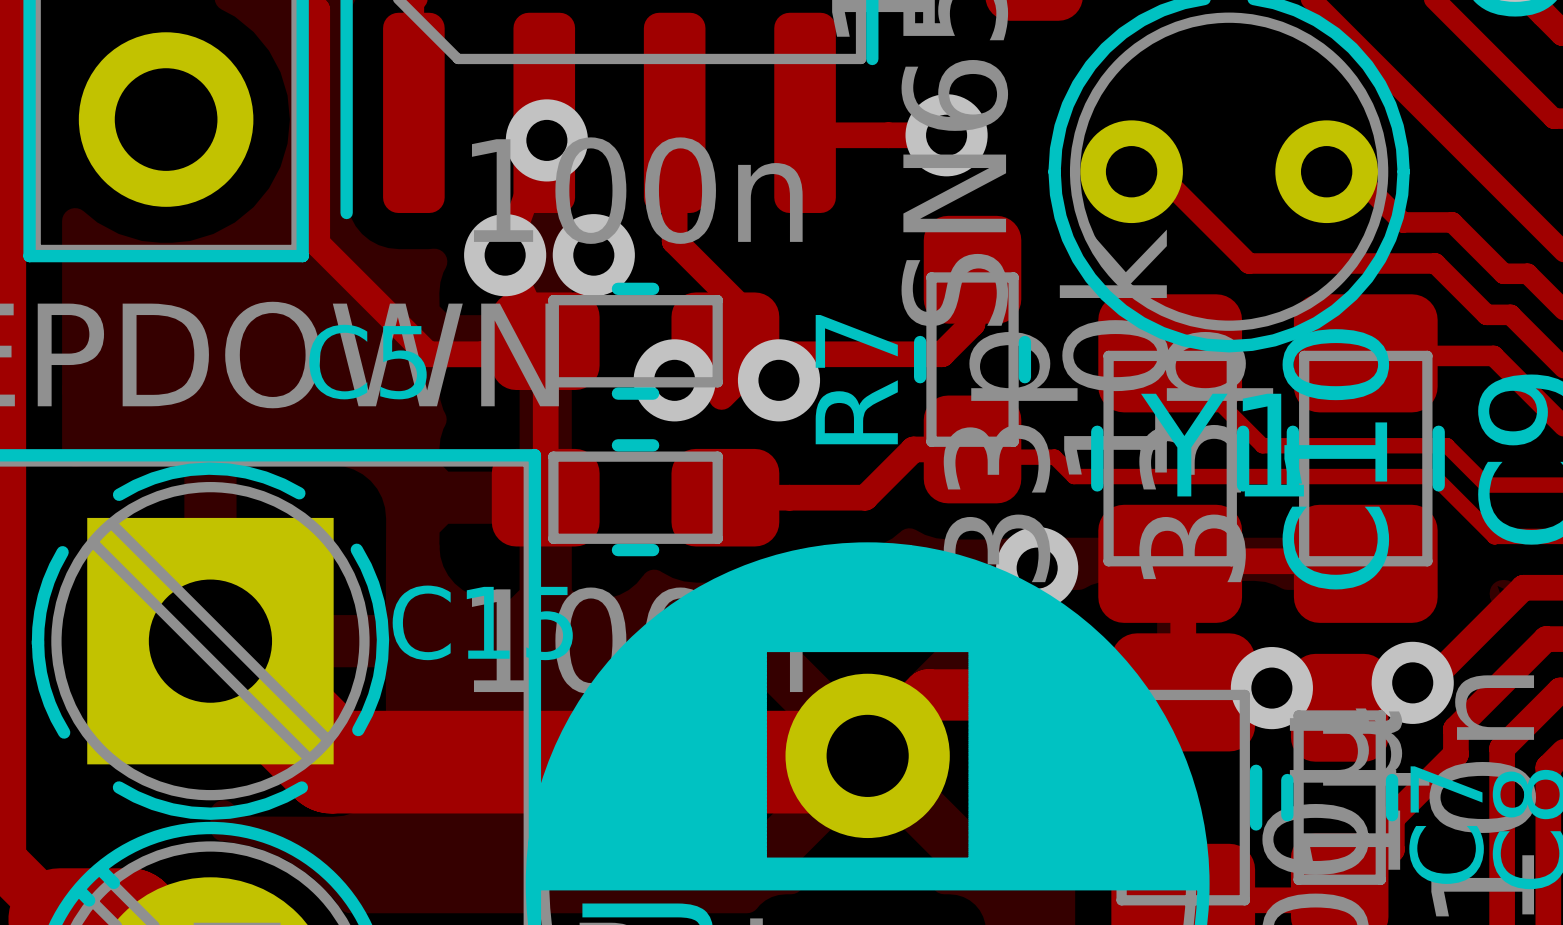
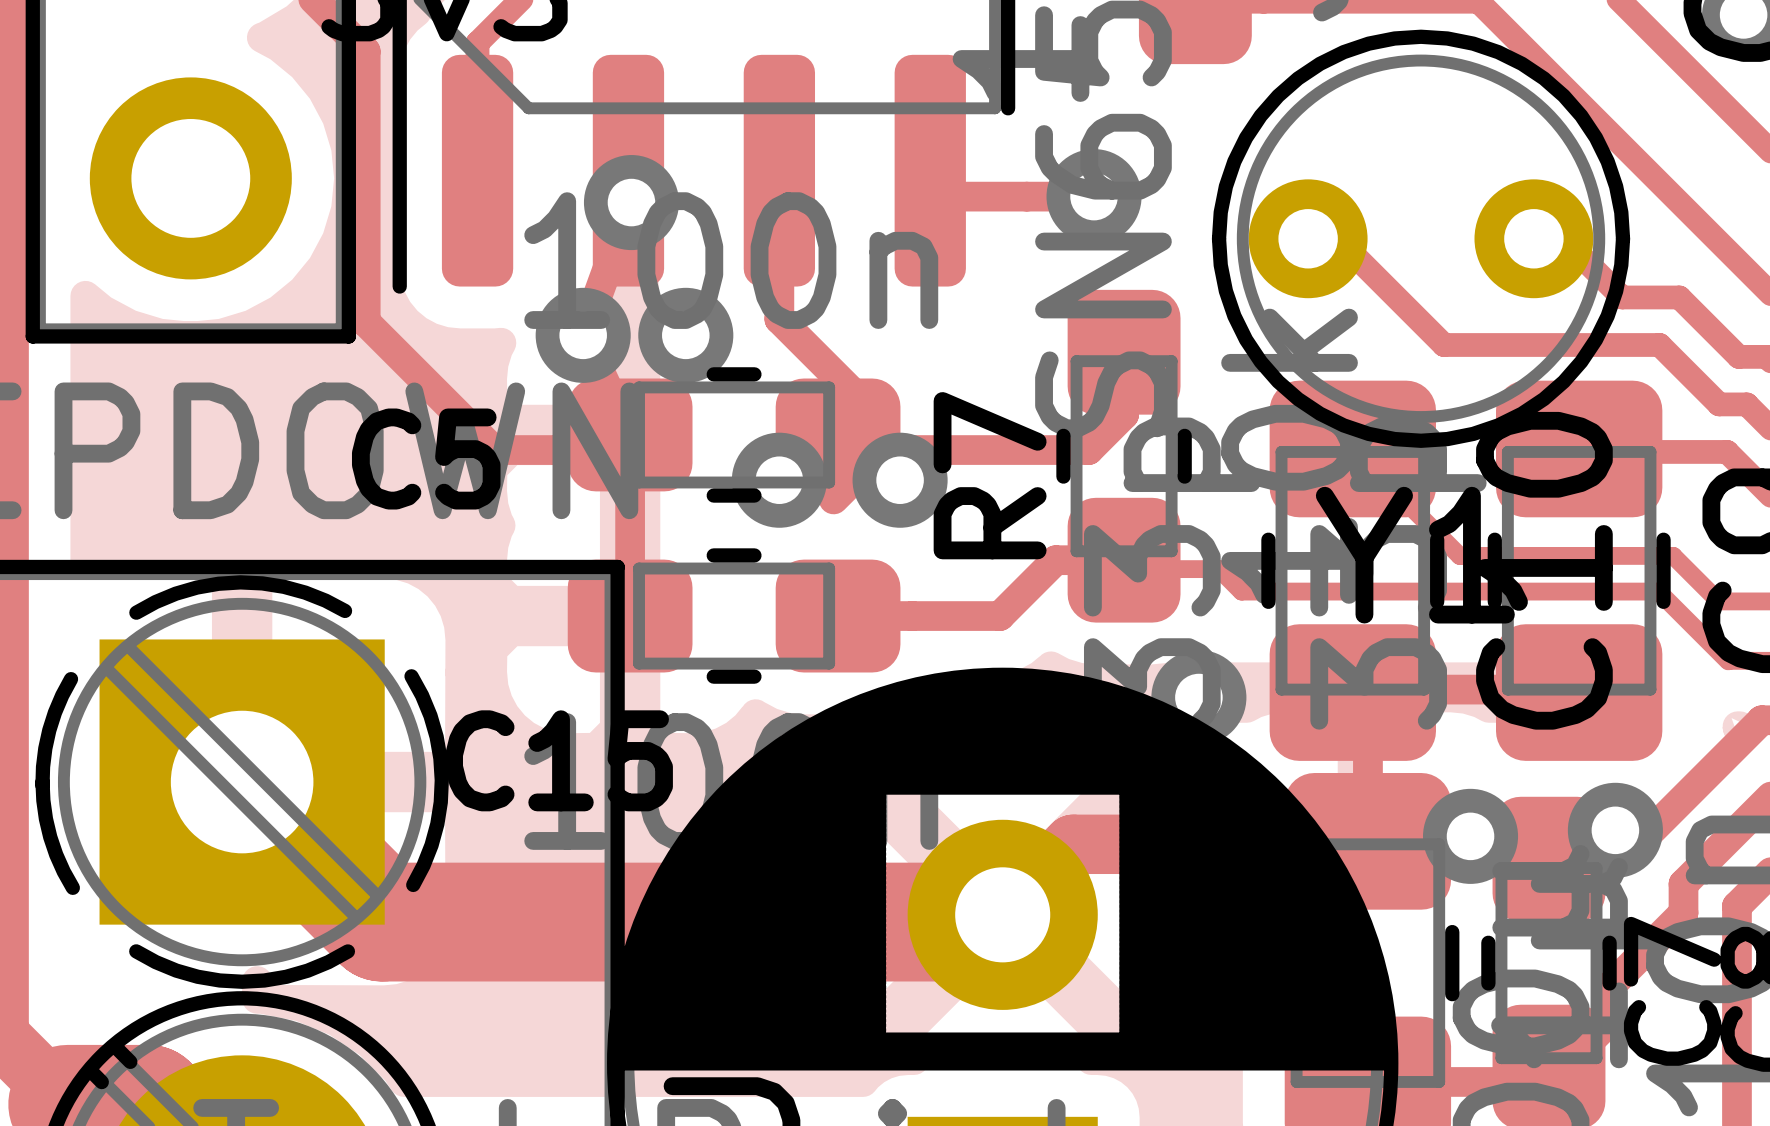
via position: (1412, 682) -> (1615, 830)

